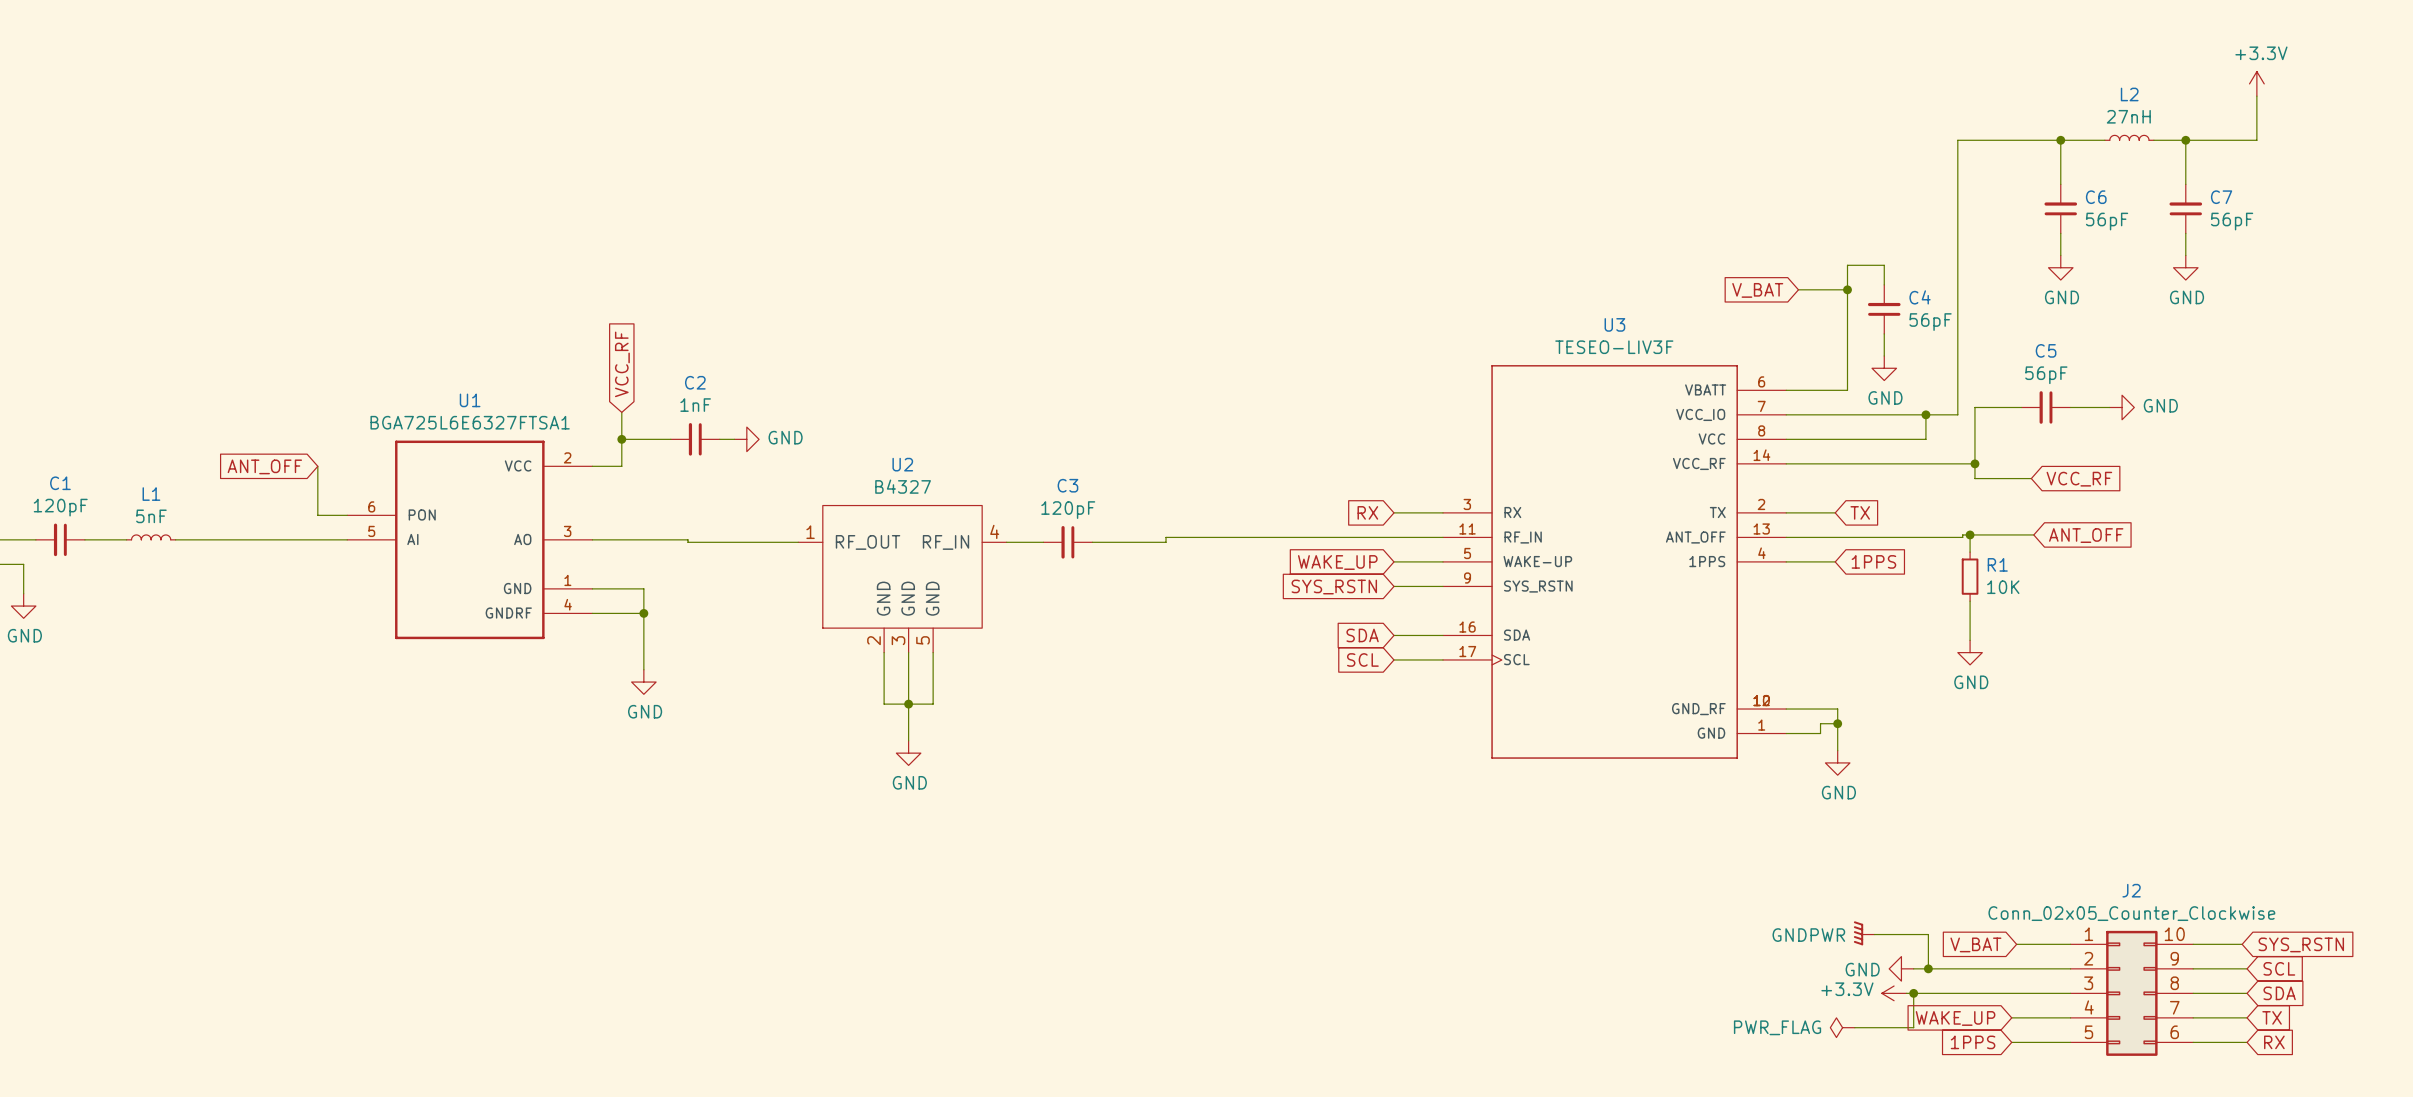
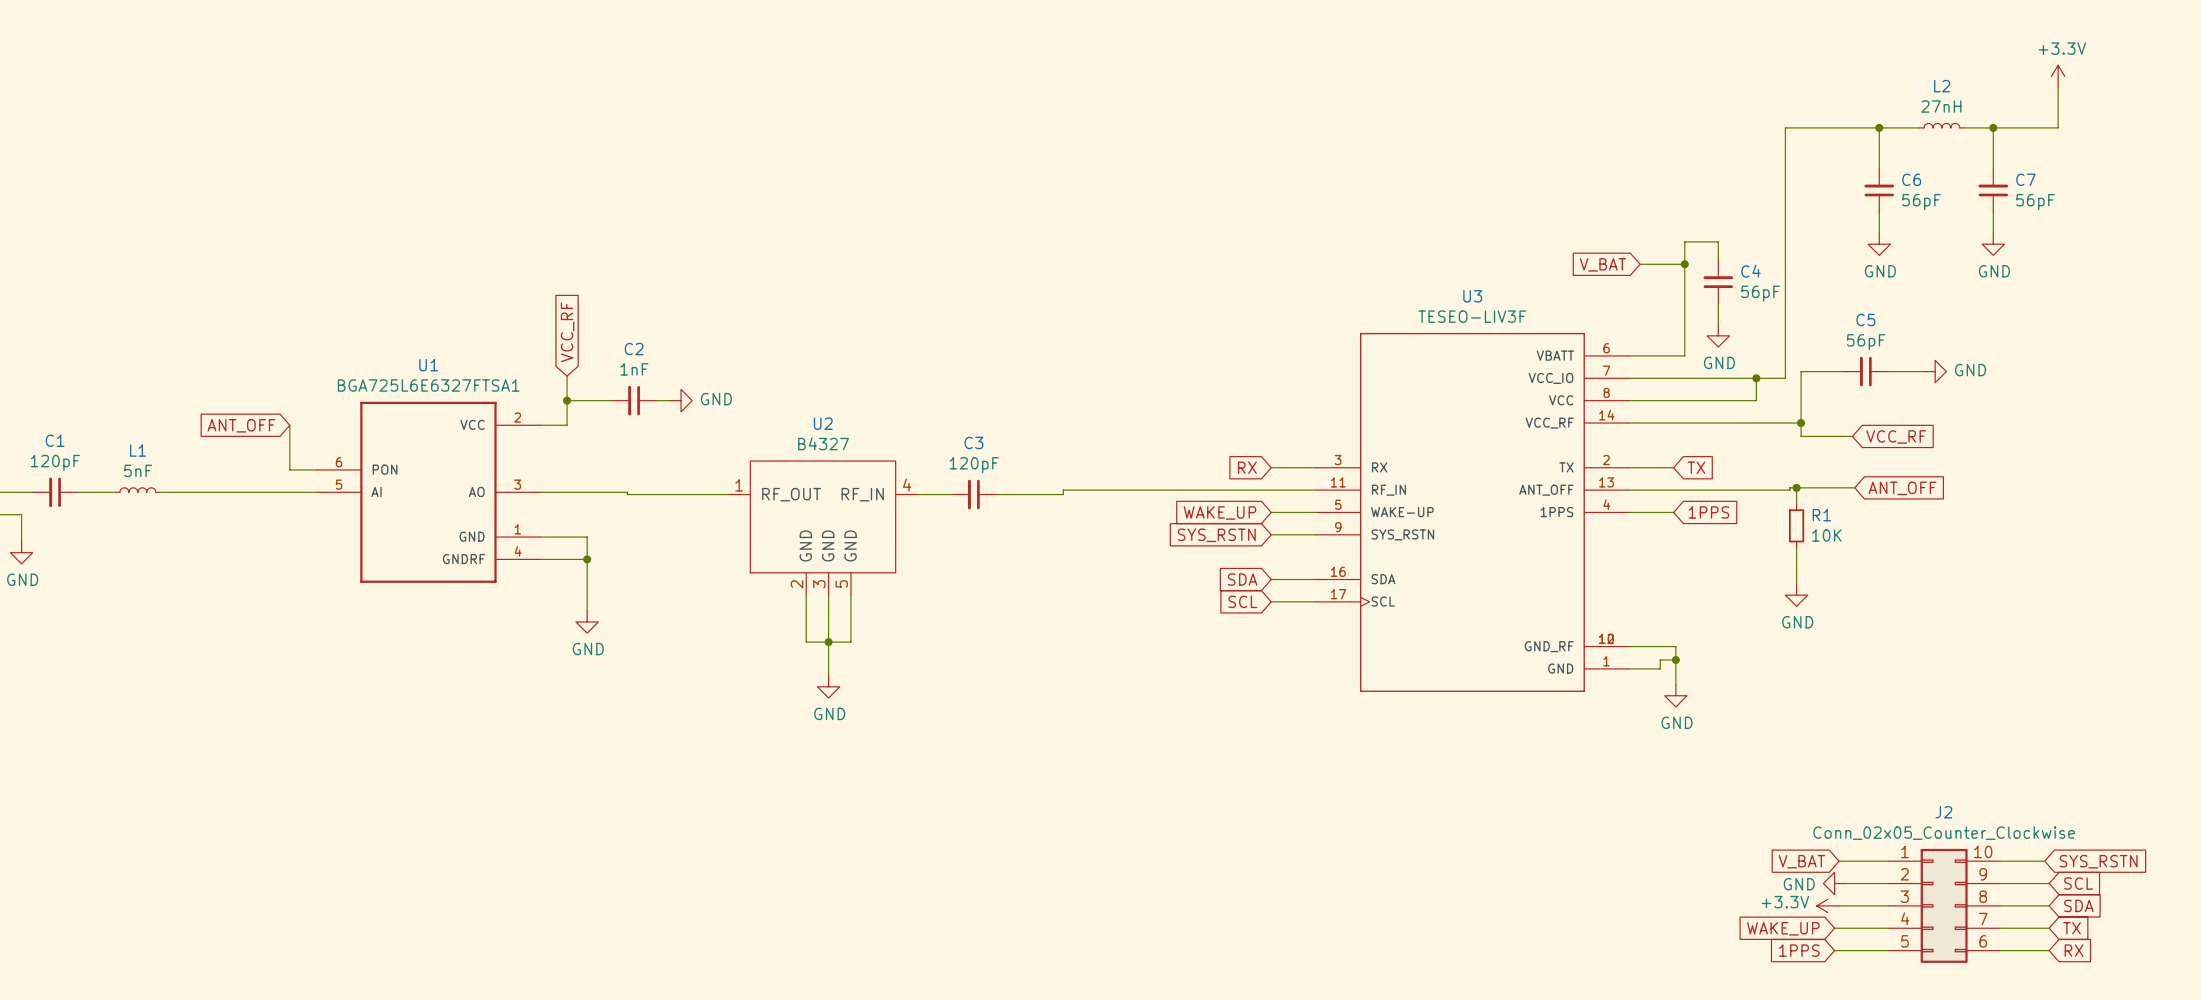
power symbol: GNDPWR (1864, 933) -> none
wire: (1874, 934) (1928, 934) (1928, 968) -> none
power symbol position: GND (1901, 968) -> GND (1834, 883)
wire: (1913, 968) (2024, 968) -> none
junction: (1928, 968) -> none
power symbol position: +3.3V (1894, 993) -> +3.3V (1827, 905)
wire: (1906, 993) (2016, 993) -> none
wire: (1913, 993) (1913, 1027) (1854, 1027) -> none
junction: (1913, 993) -> none
power symbol: PWR_FLAG (1842, 1027) -> none

